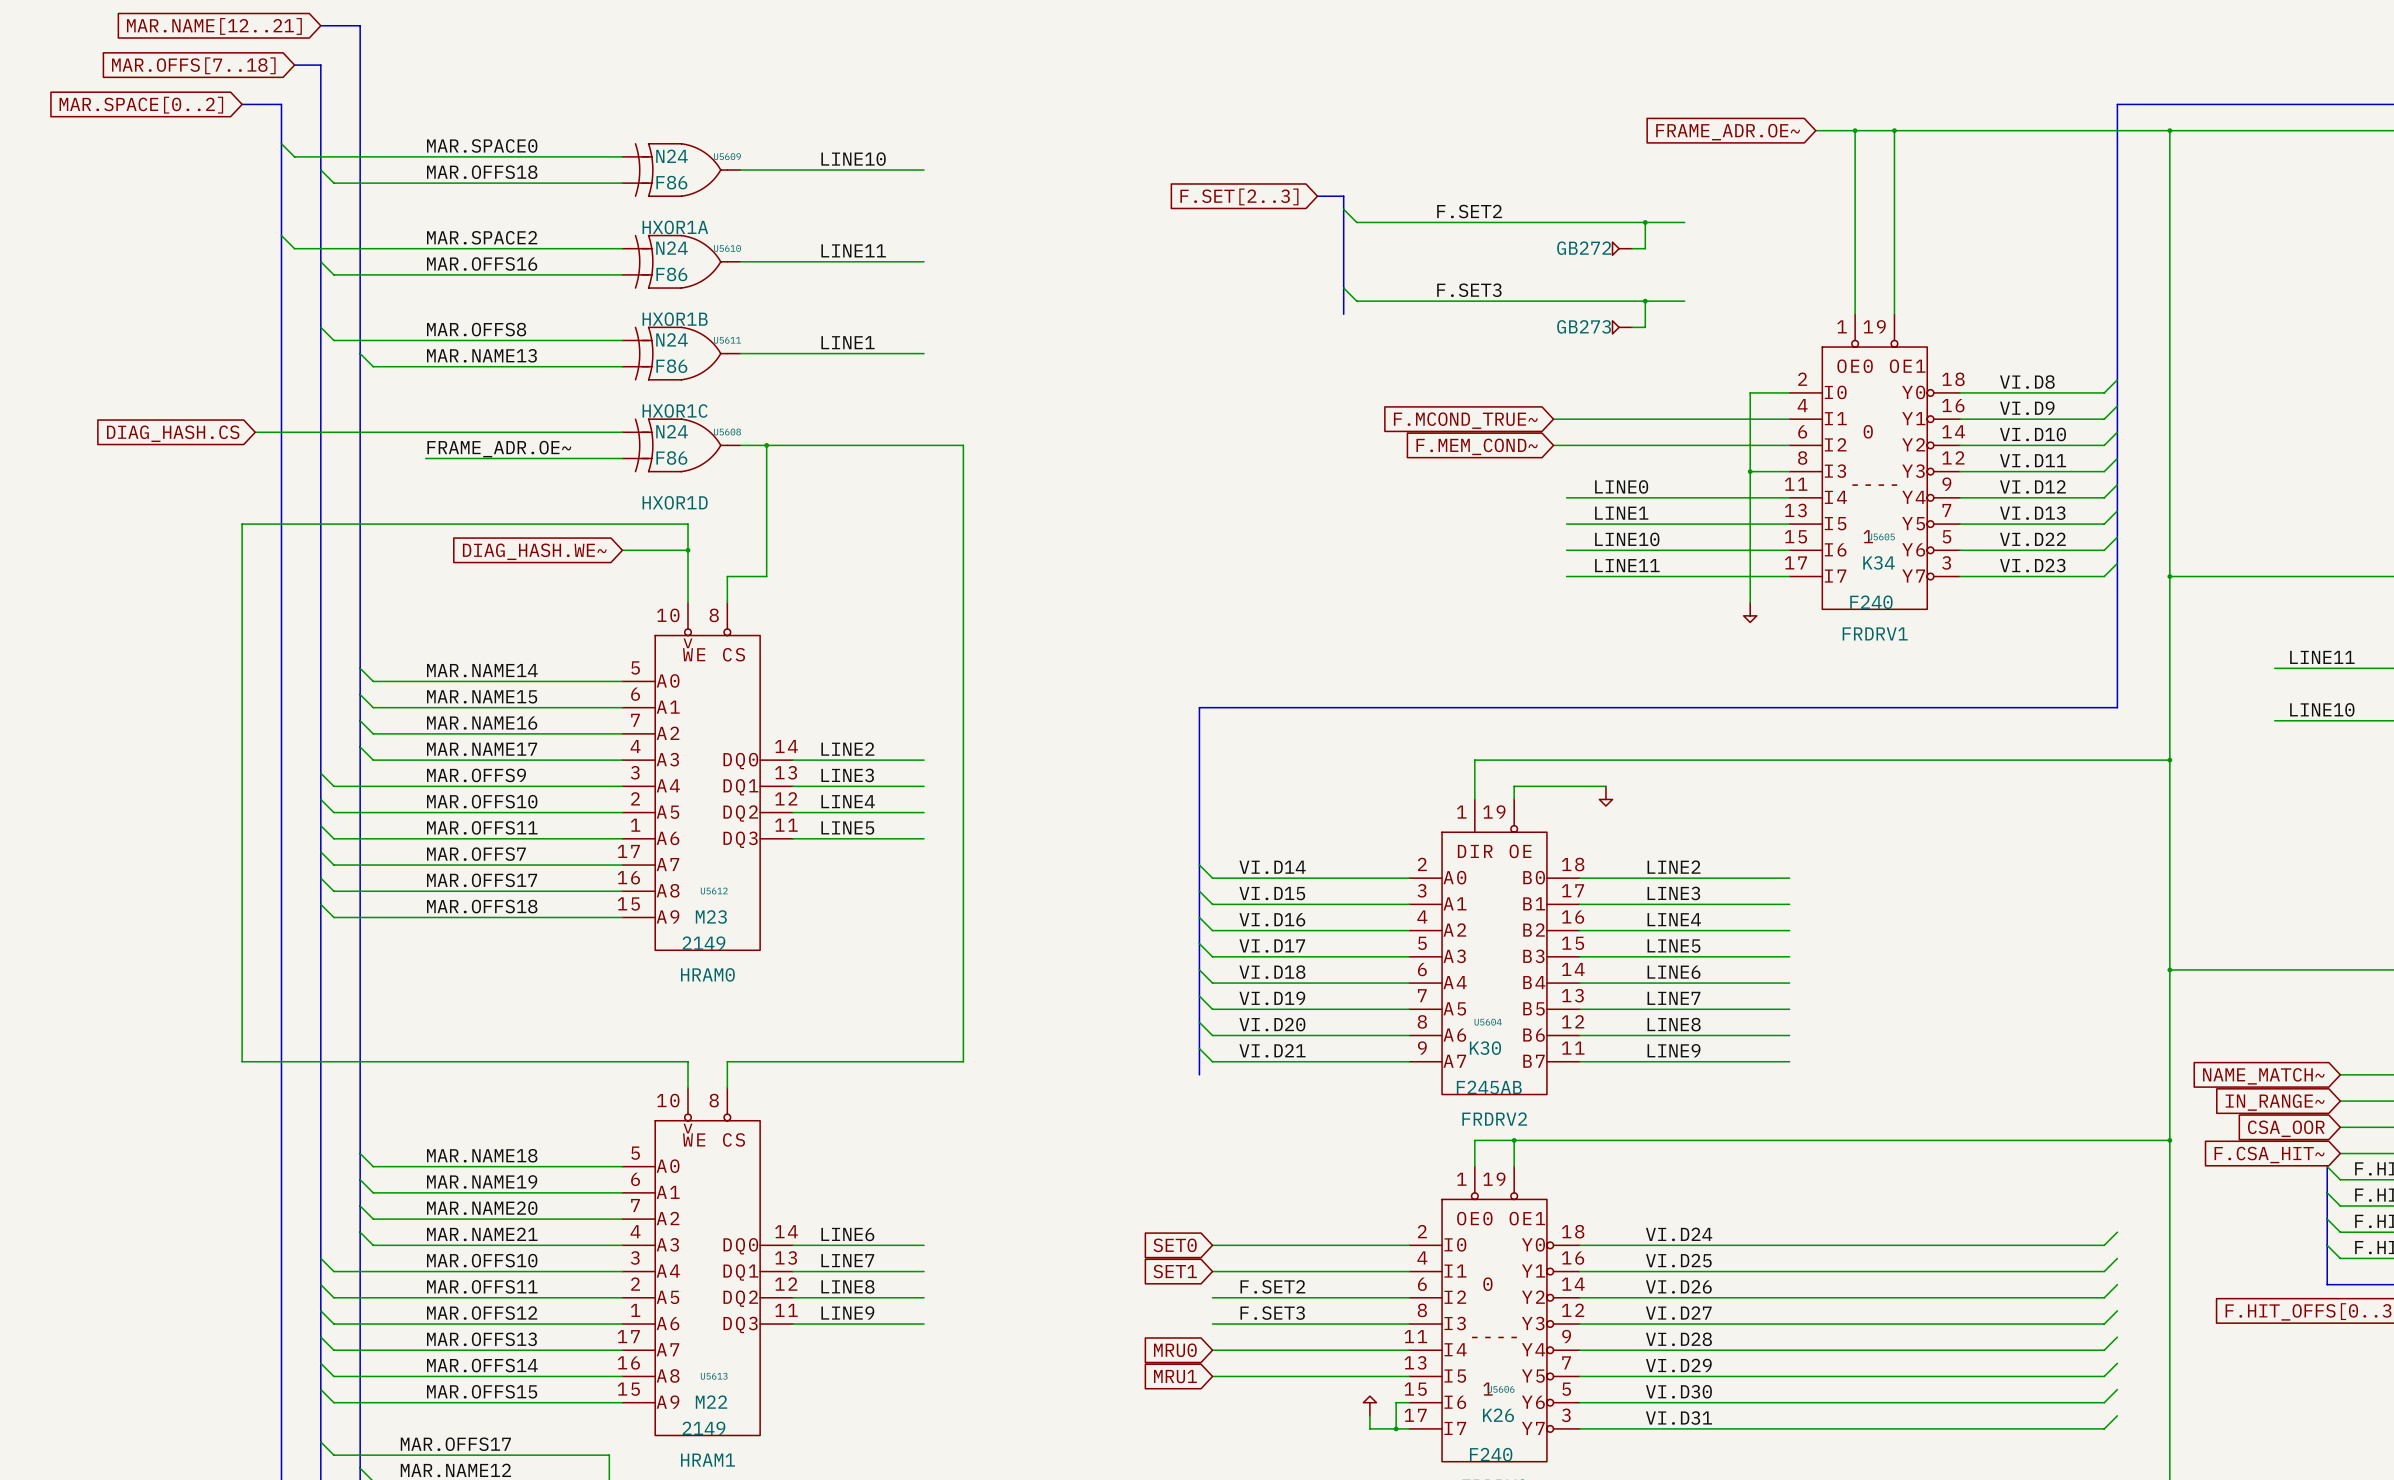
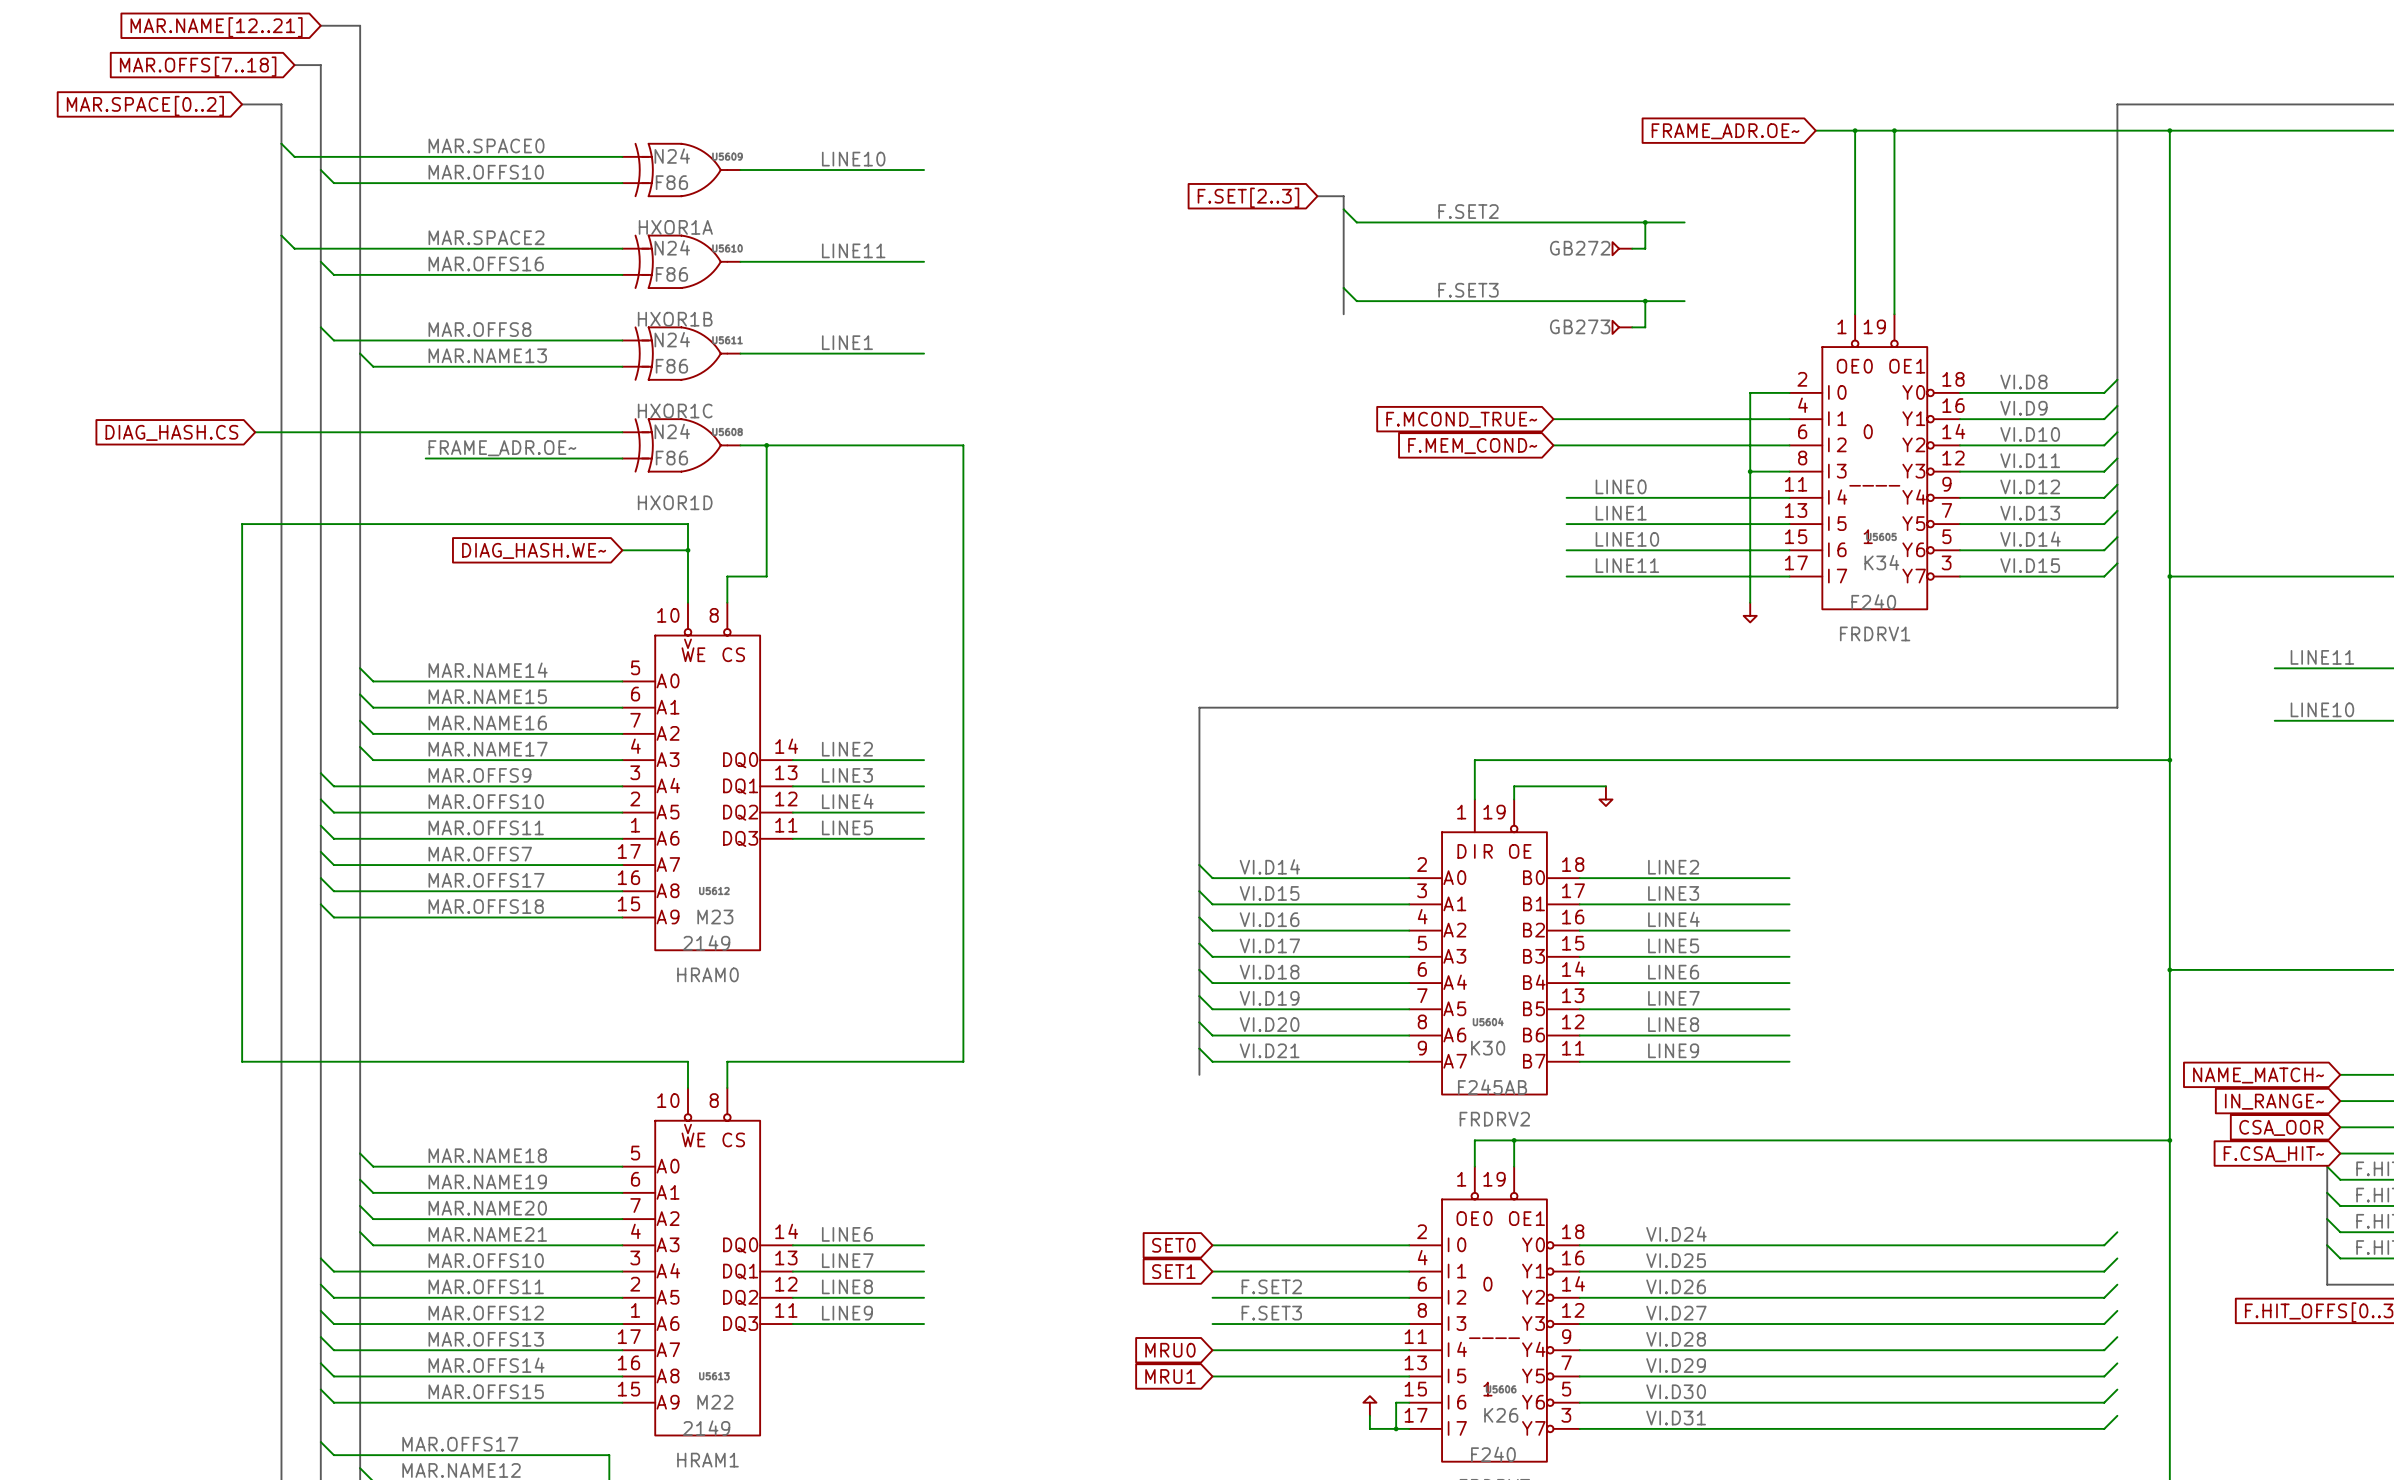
label: MAR.OFFS18 (482, 172) -> MAR.OFFS10 (486, 172)
label: VI.D22 (2032, 539) -> VI.D14 (2030, 539)
label: VI.D23 (2032, 565) -> VI.D15 (2030, 565)

